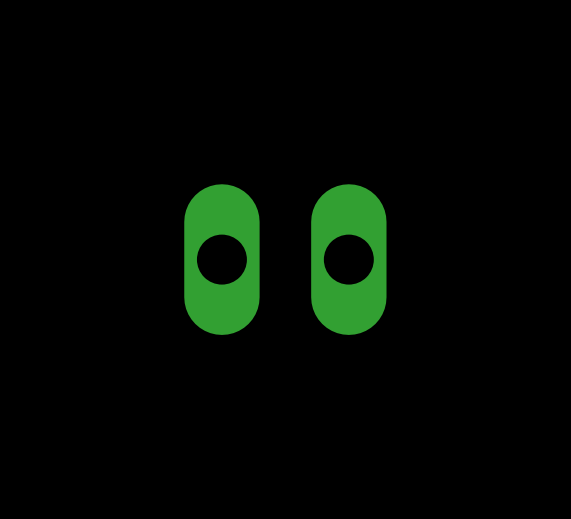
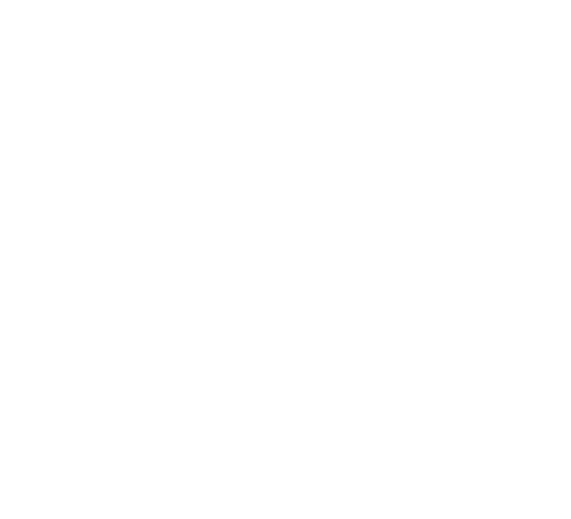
part: (285, 259) -> none

